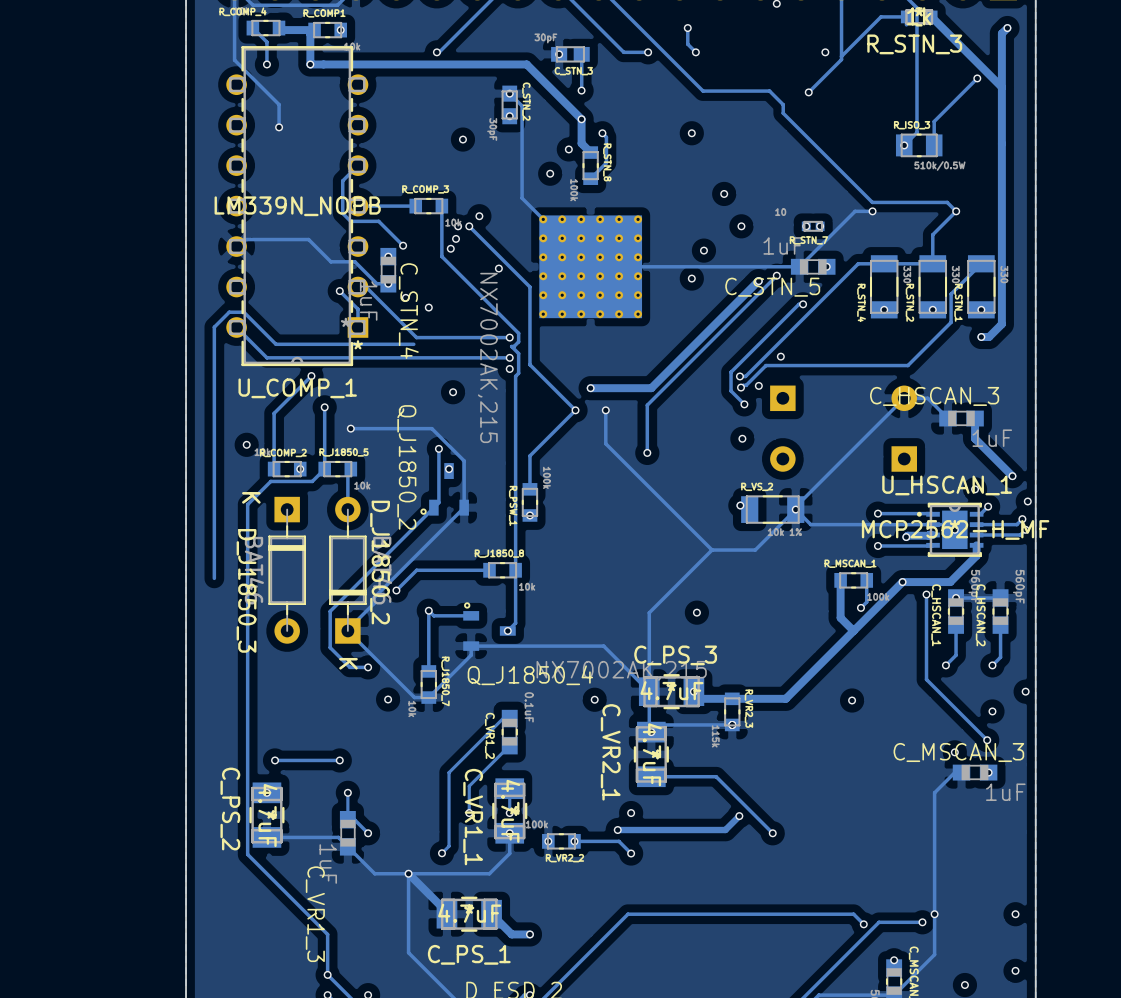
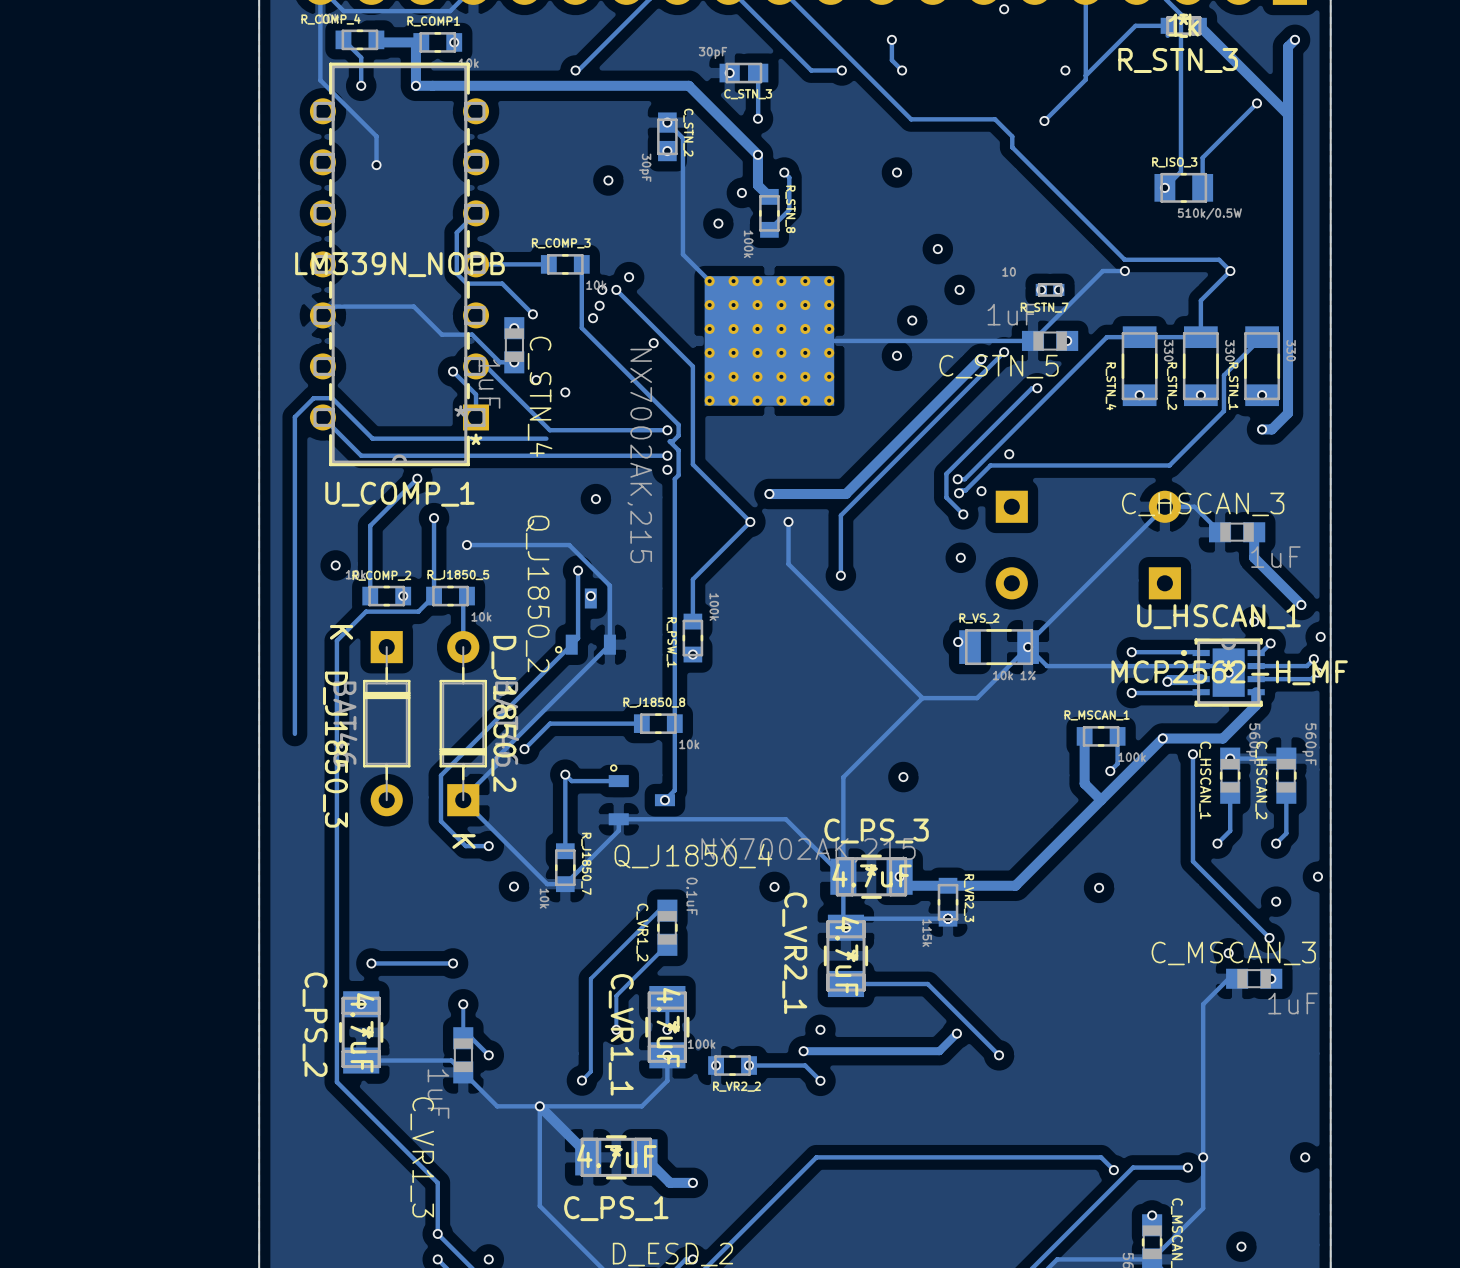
via: (1015, 970) -> none

